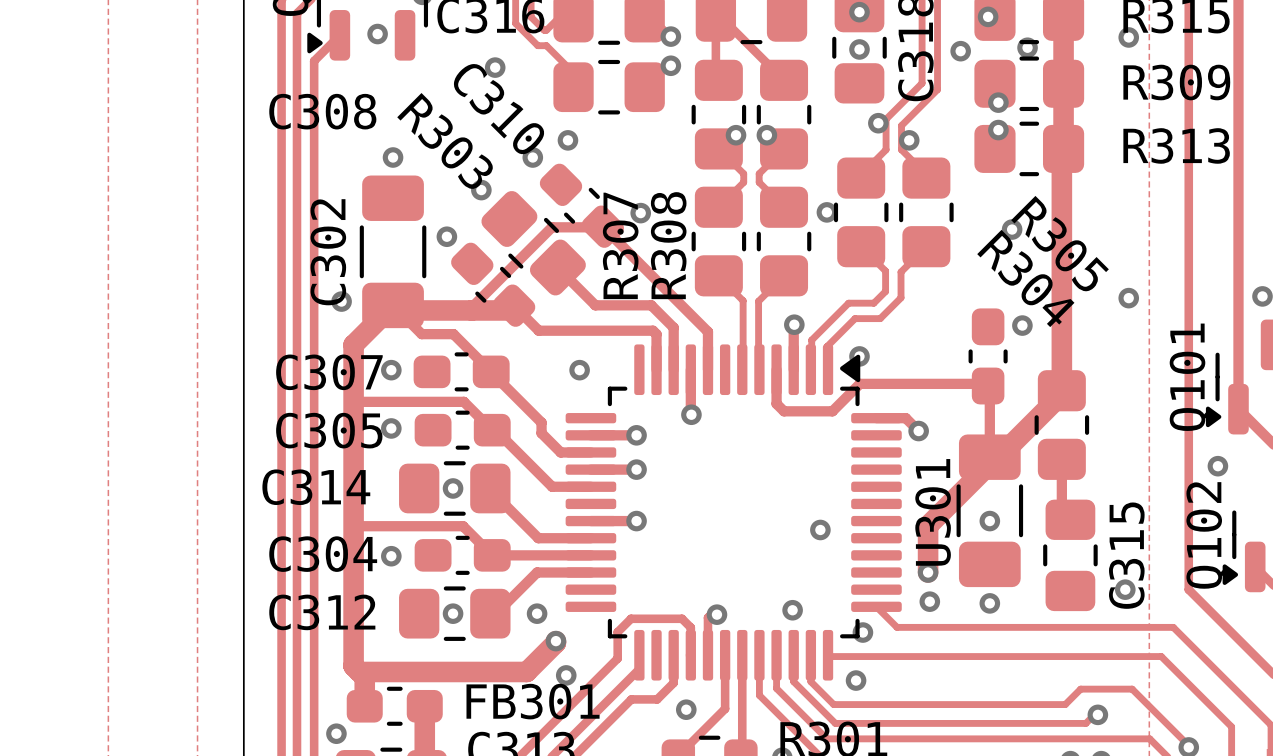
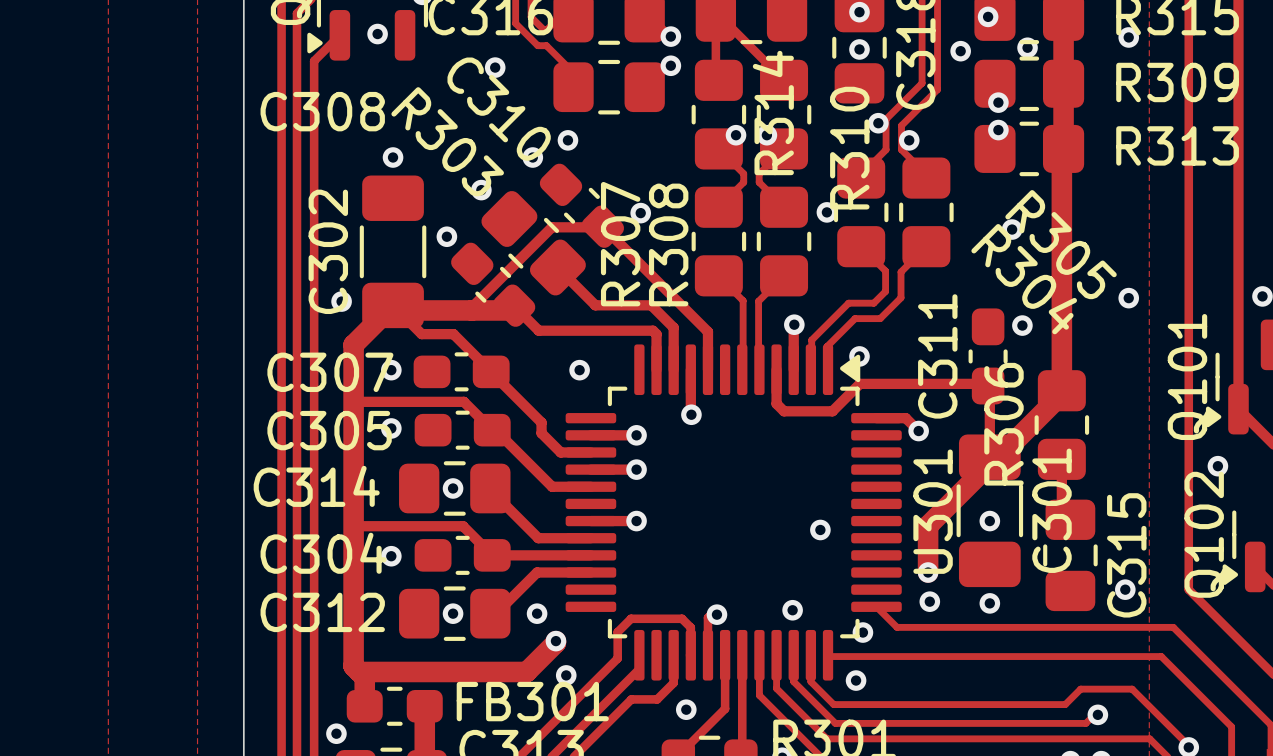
R314 name: none -> R314 (773, 113)
R310 name: none -> R310 (849, 148)
C311 name: none -> C311 (937, 356)
R306 name: none -> R306 (1003, 424)
C301 name: none -> C301 (1051, 510)

